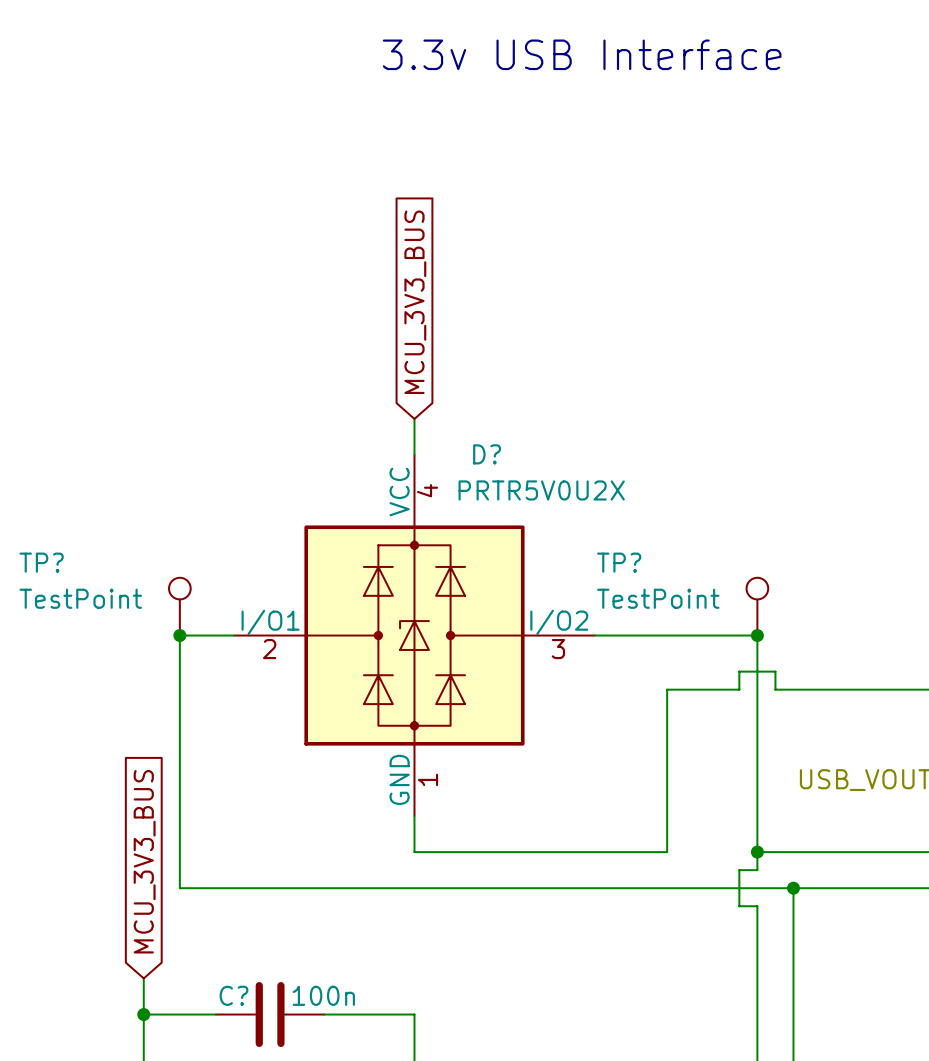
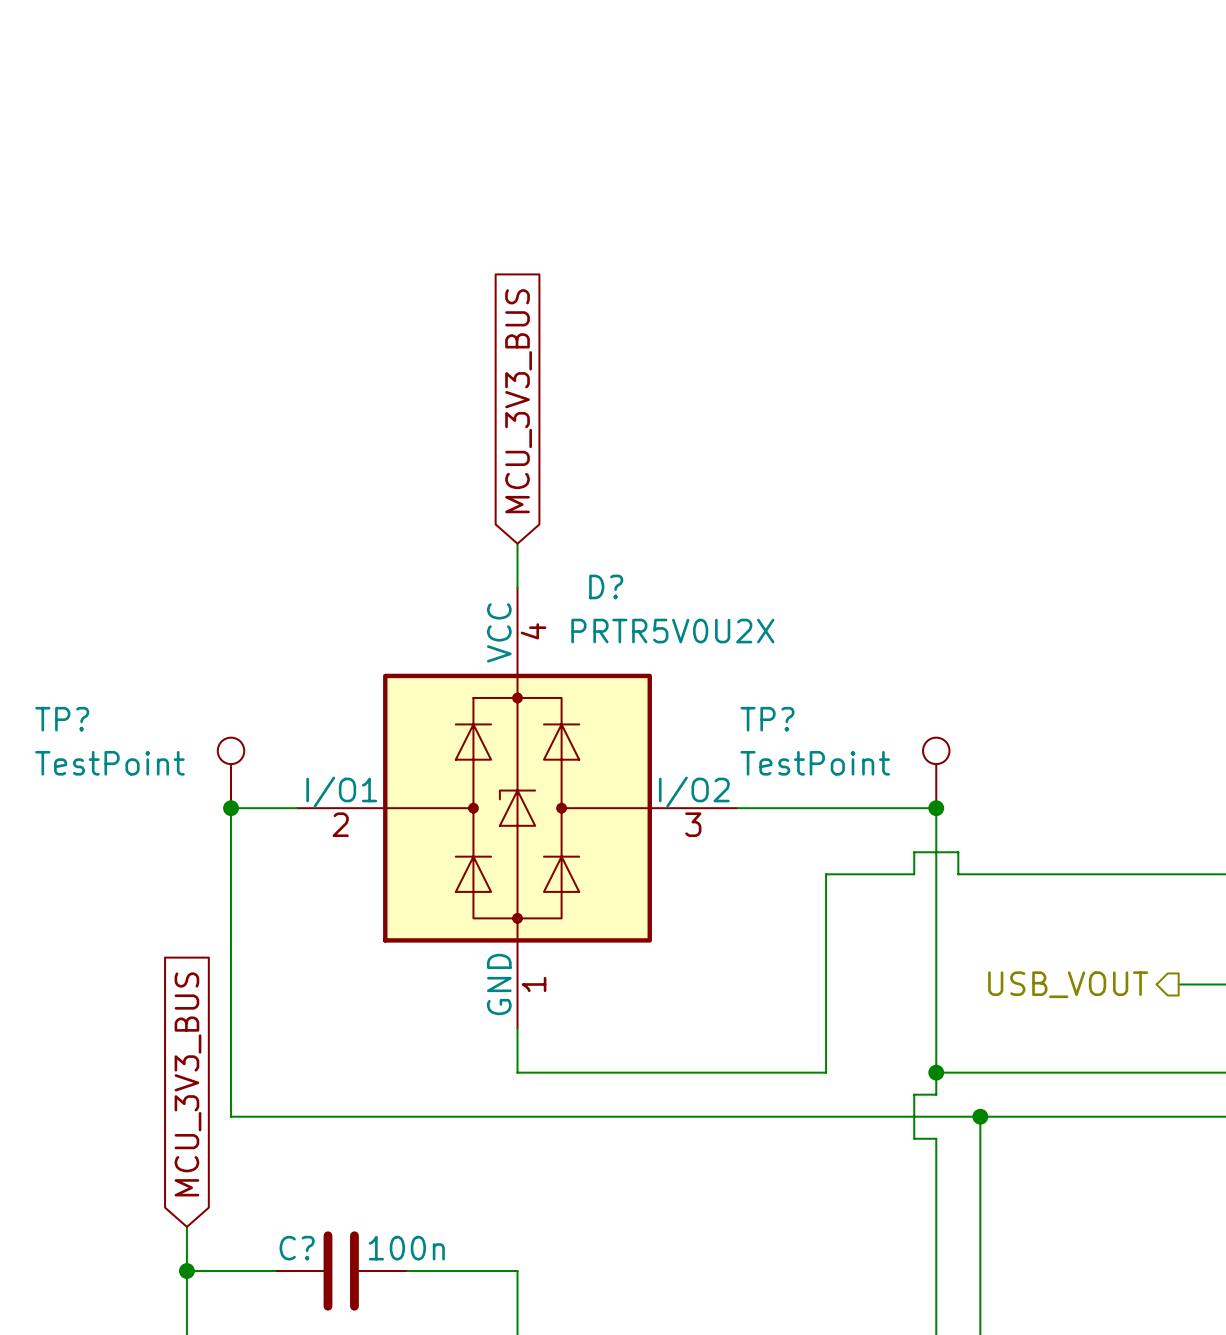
text: 3.3v USB Interface (582, 54) -> none

